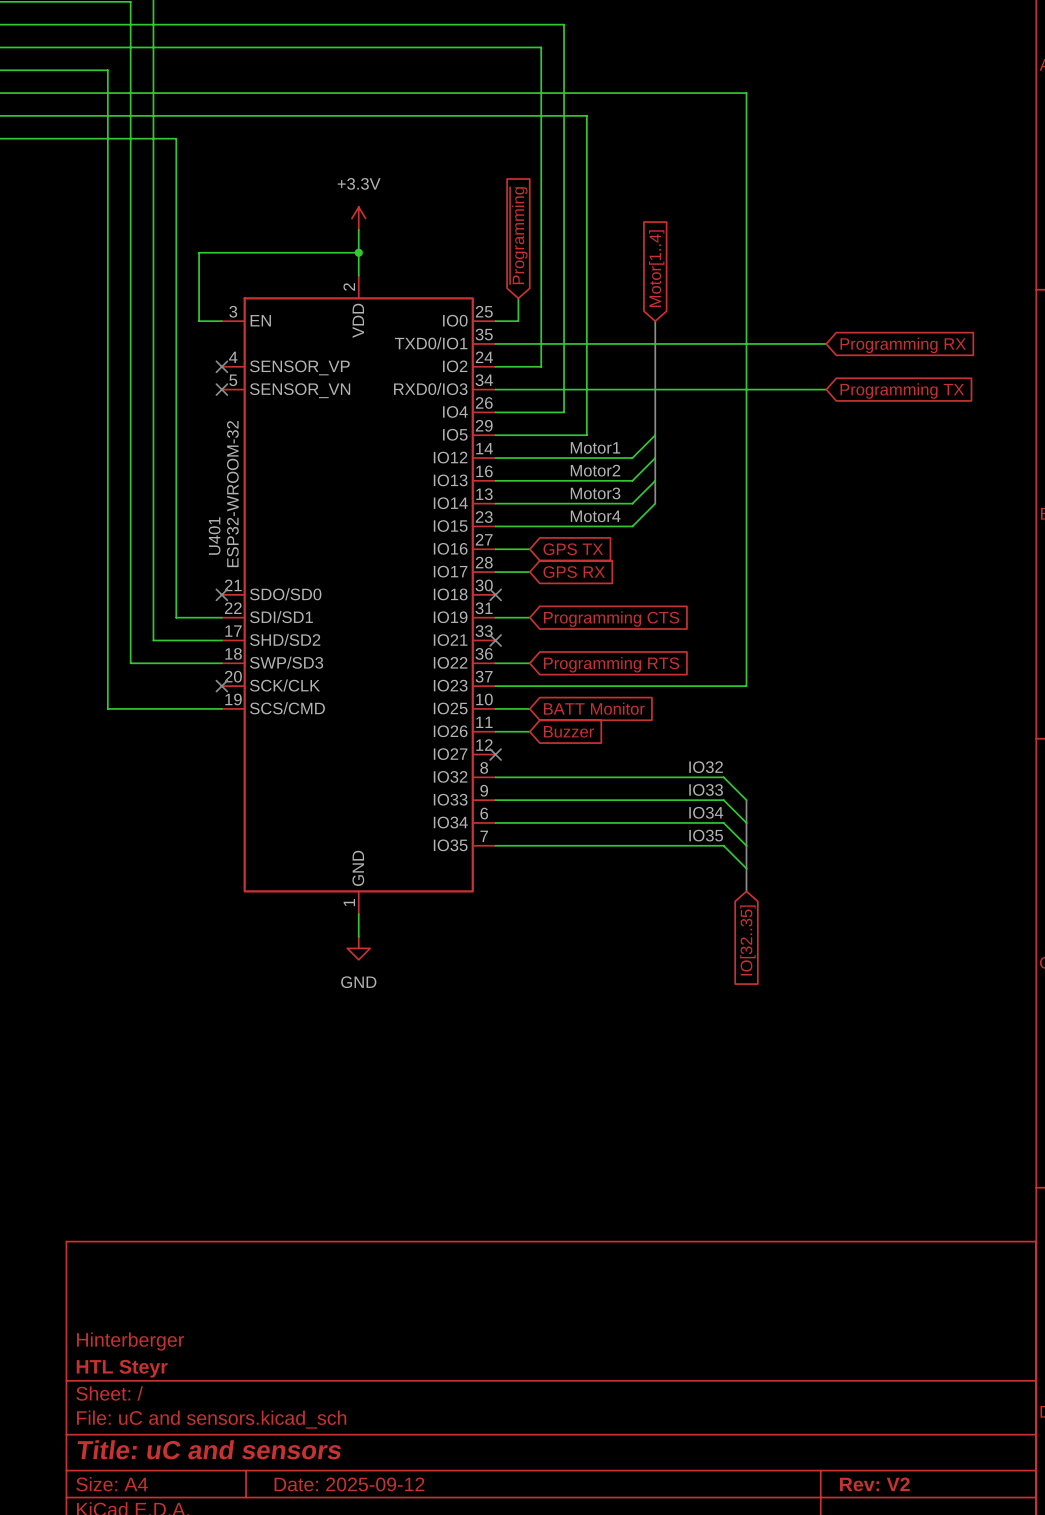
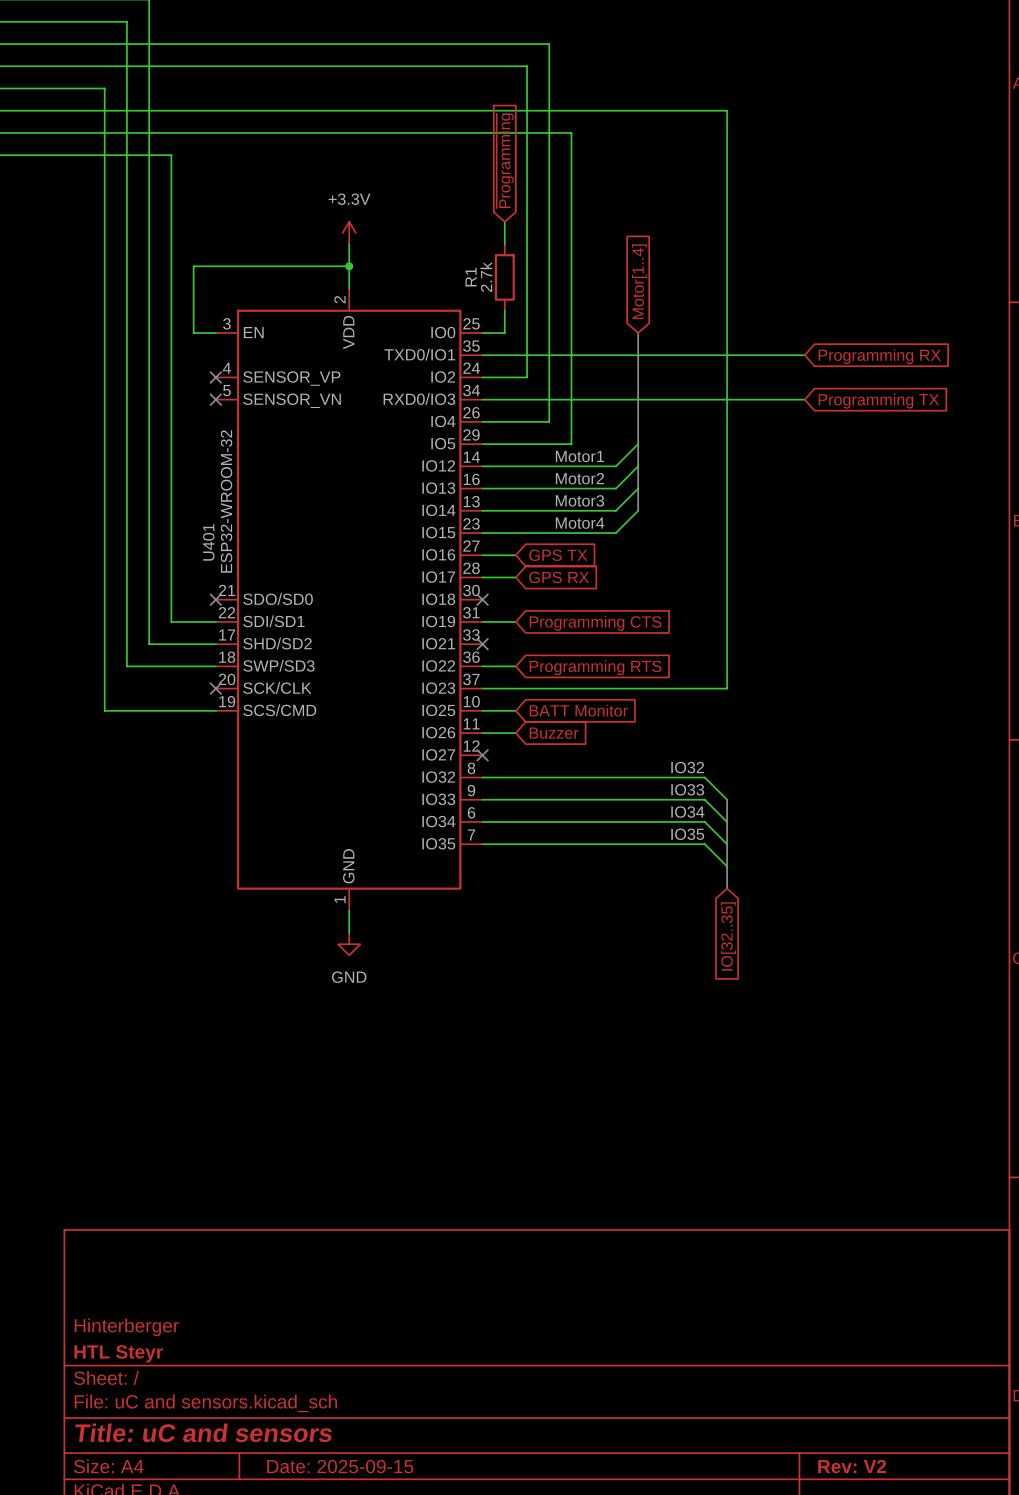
wire: none -> (504, 221) (504, 244)
global label position: ~{Programming} (518, 235) -> ~{Programming} (505, 160)
R1: none -> 2.7k (504, 277)
title block: Date: 2025-09-12 (349, 1484) -> Date: 2025-09-15 (340, 1466)

